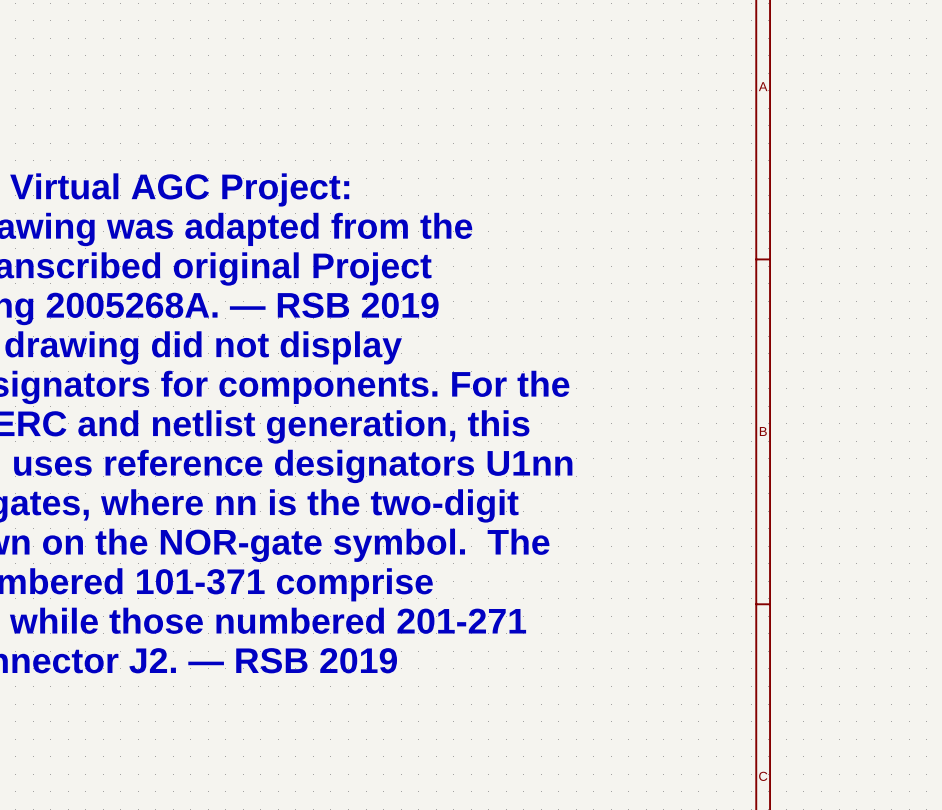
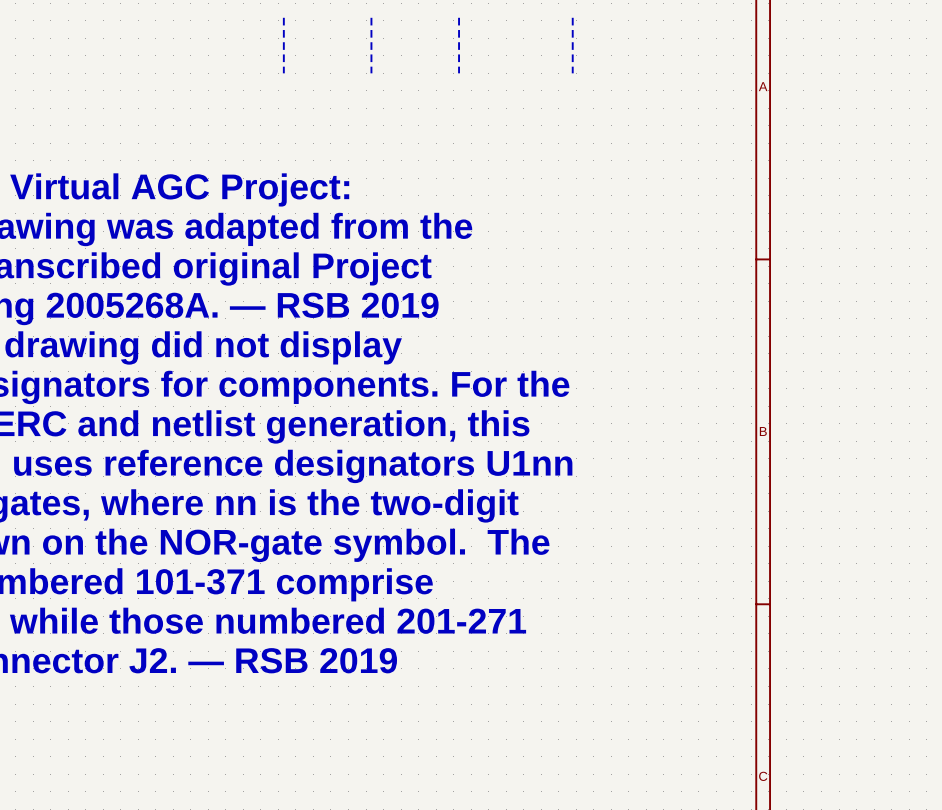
line: none -> (283, 17) (283, 73)
line: none -> (371, 17) (371, 73)
line: none -> (459, 17) (459, 73)
line: none -> (572, 17) (572, 73)

